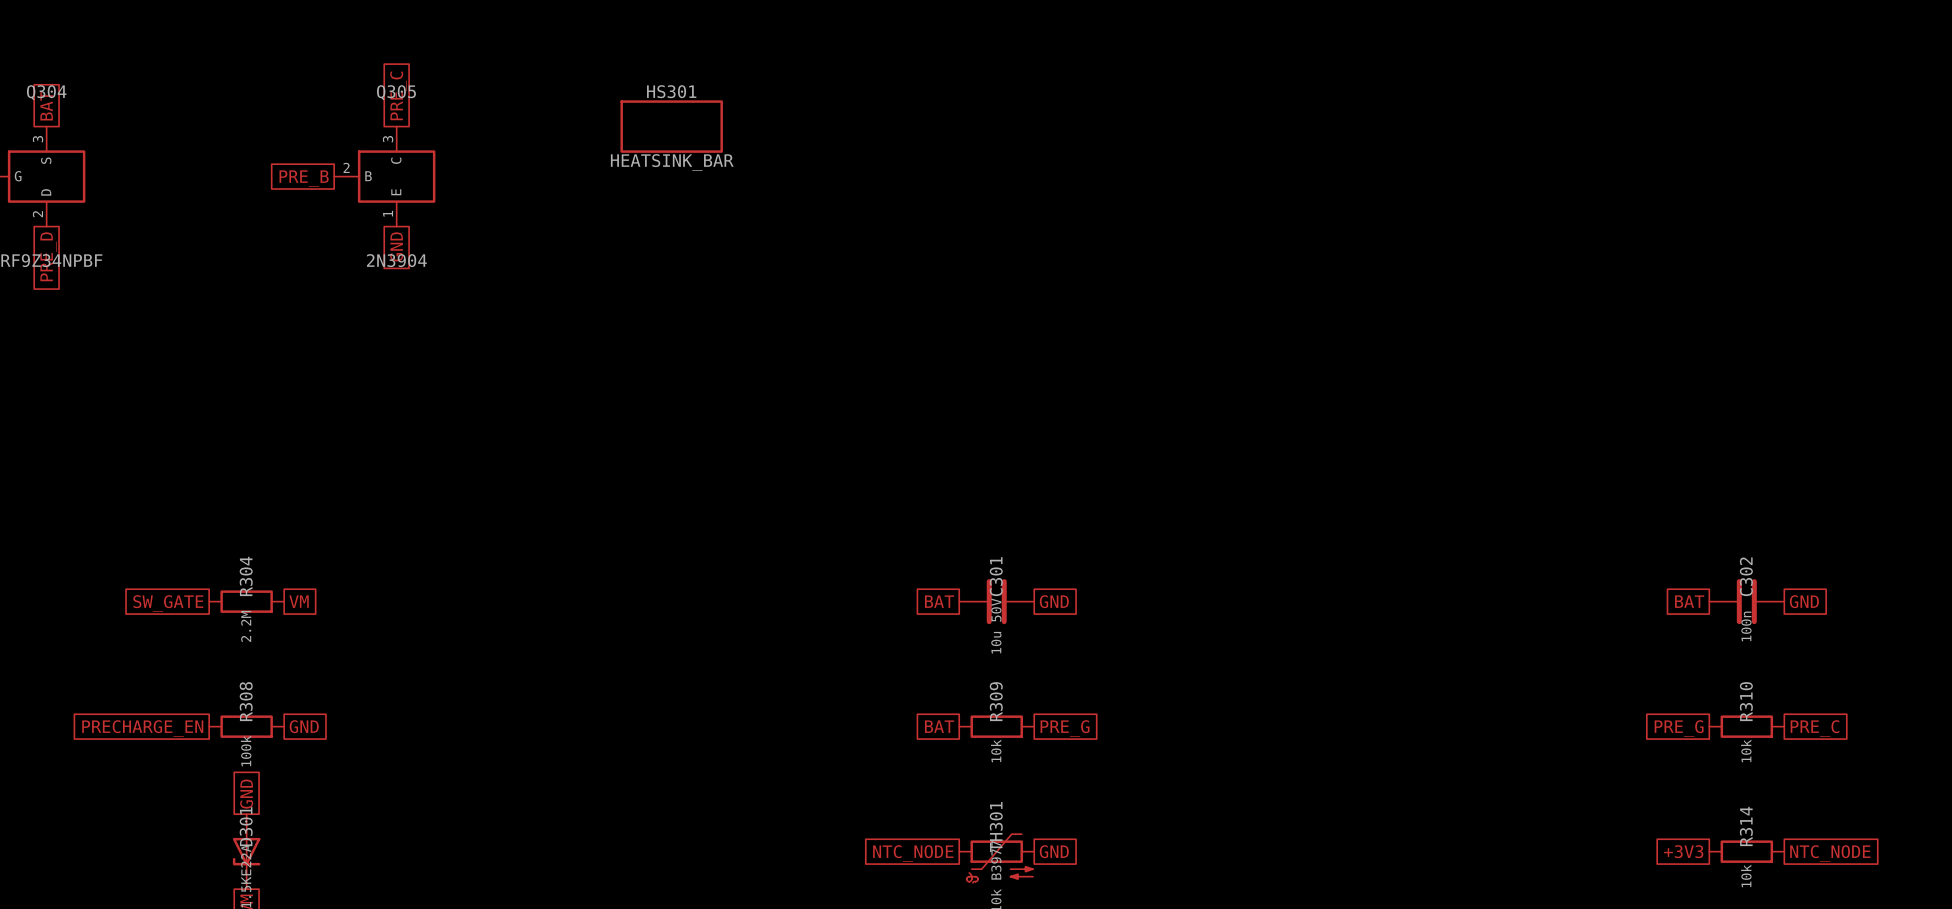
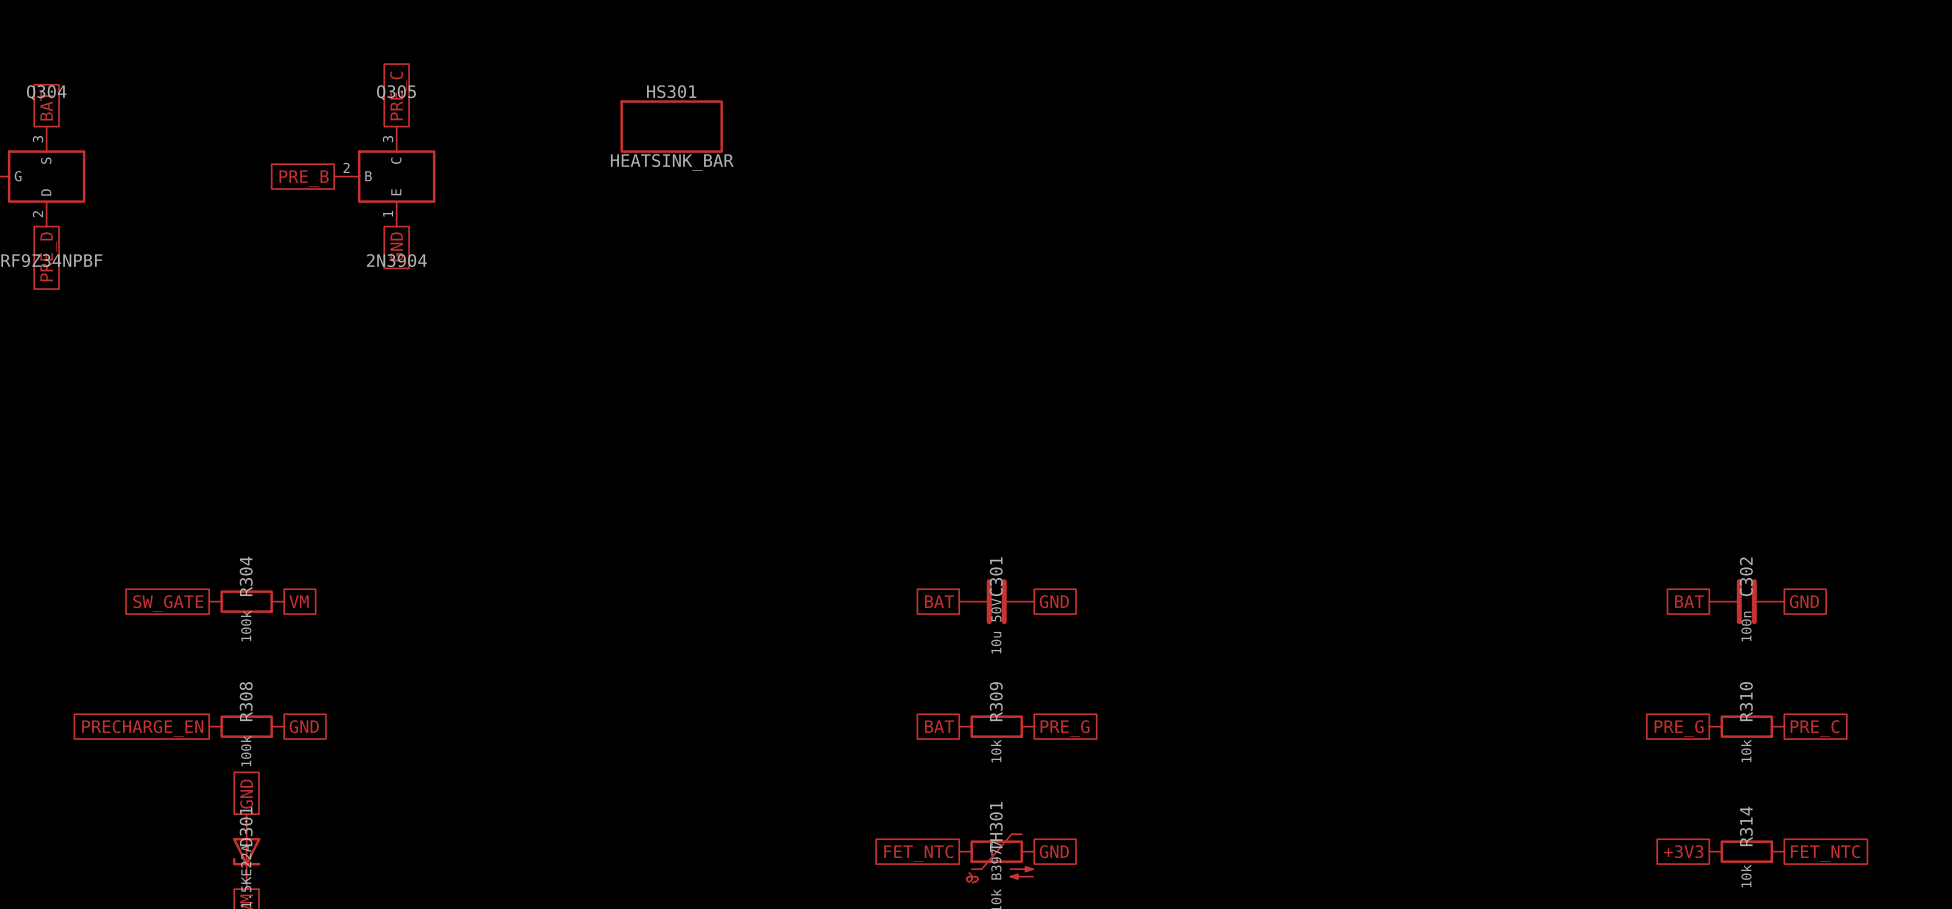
R304 value: 2.2M (246, 626) -> 100k (246, 625)
global label: NTC_NODE (913, 853) -> FET_NTC (918, 853)
global label: NTC_NODE (1830, 853) -> FET_NTC (1825, 853)

